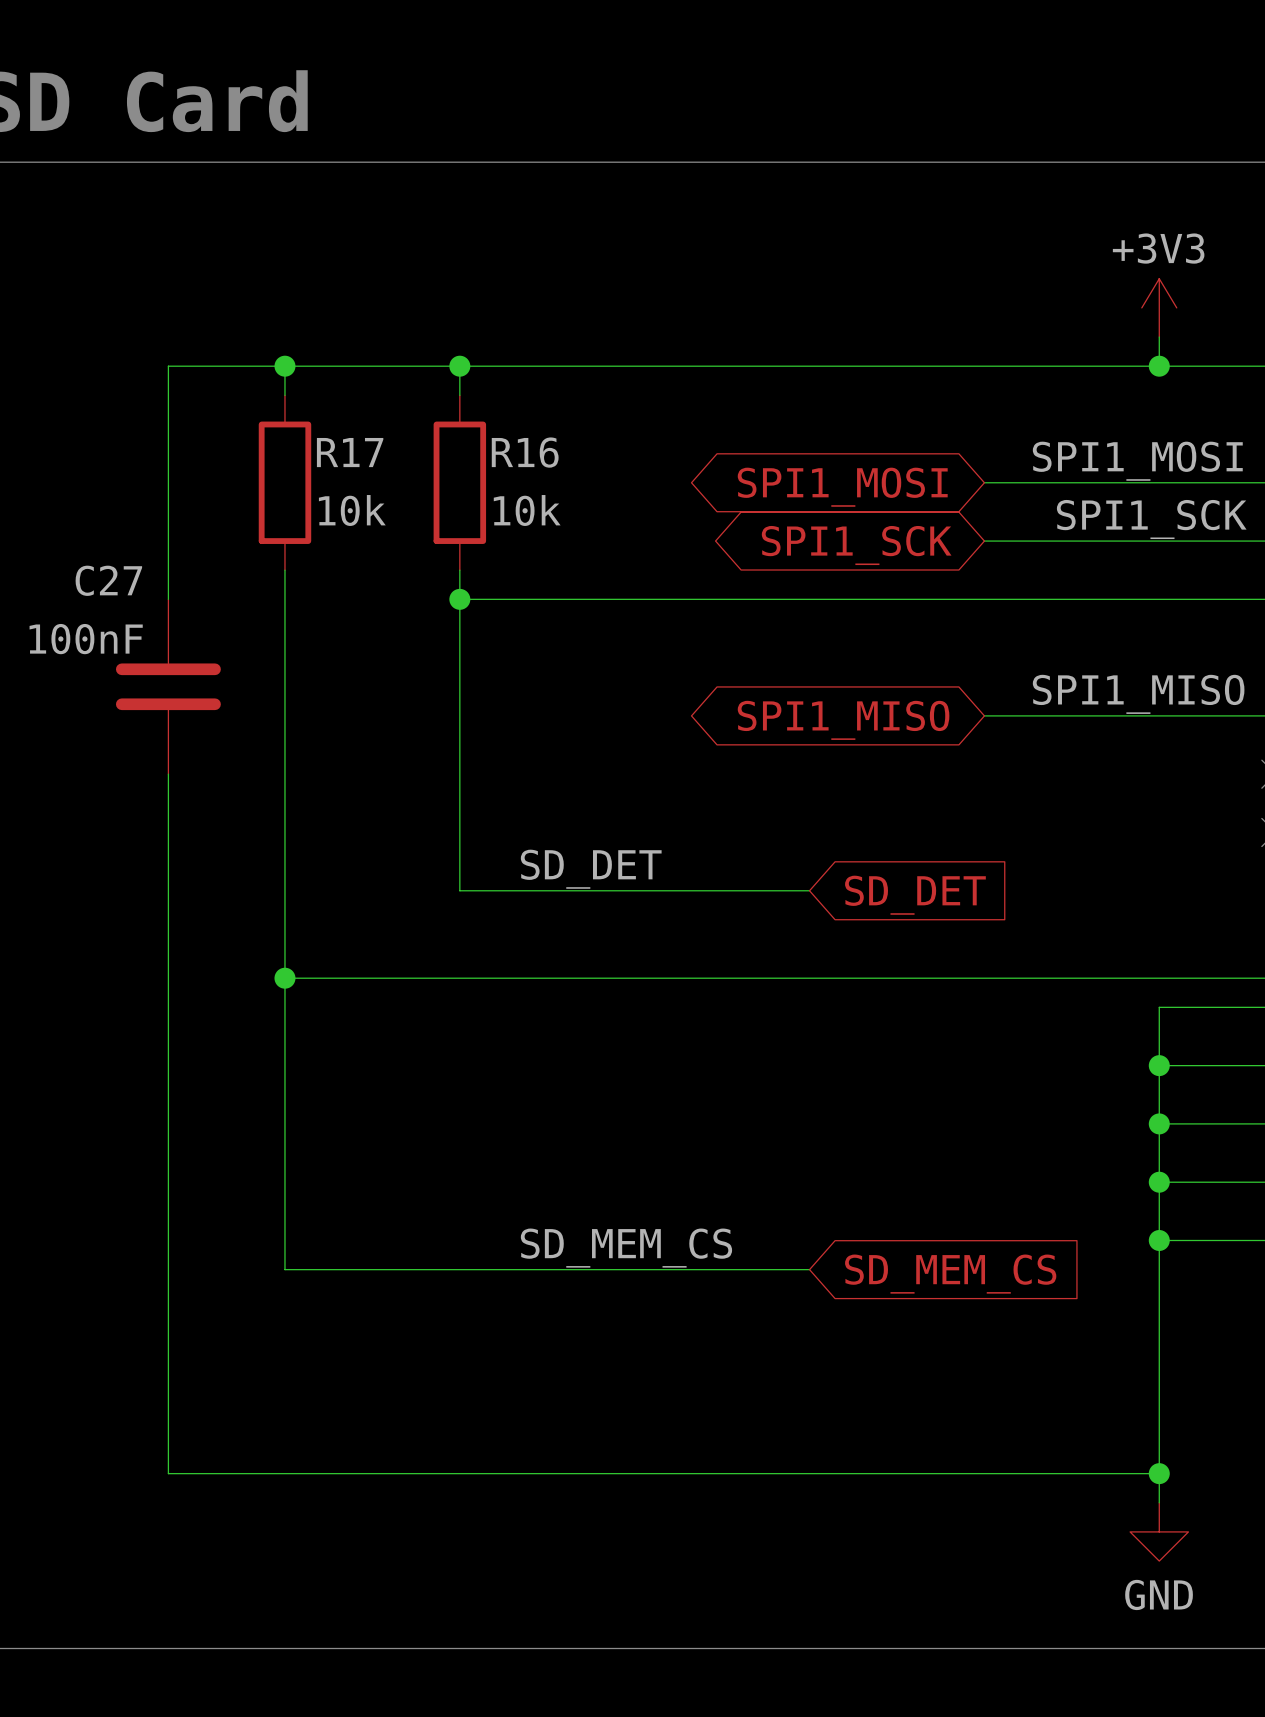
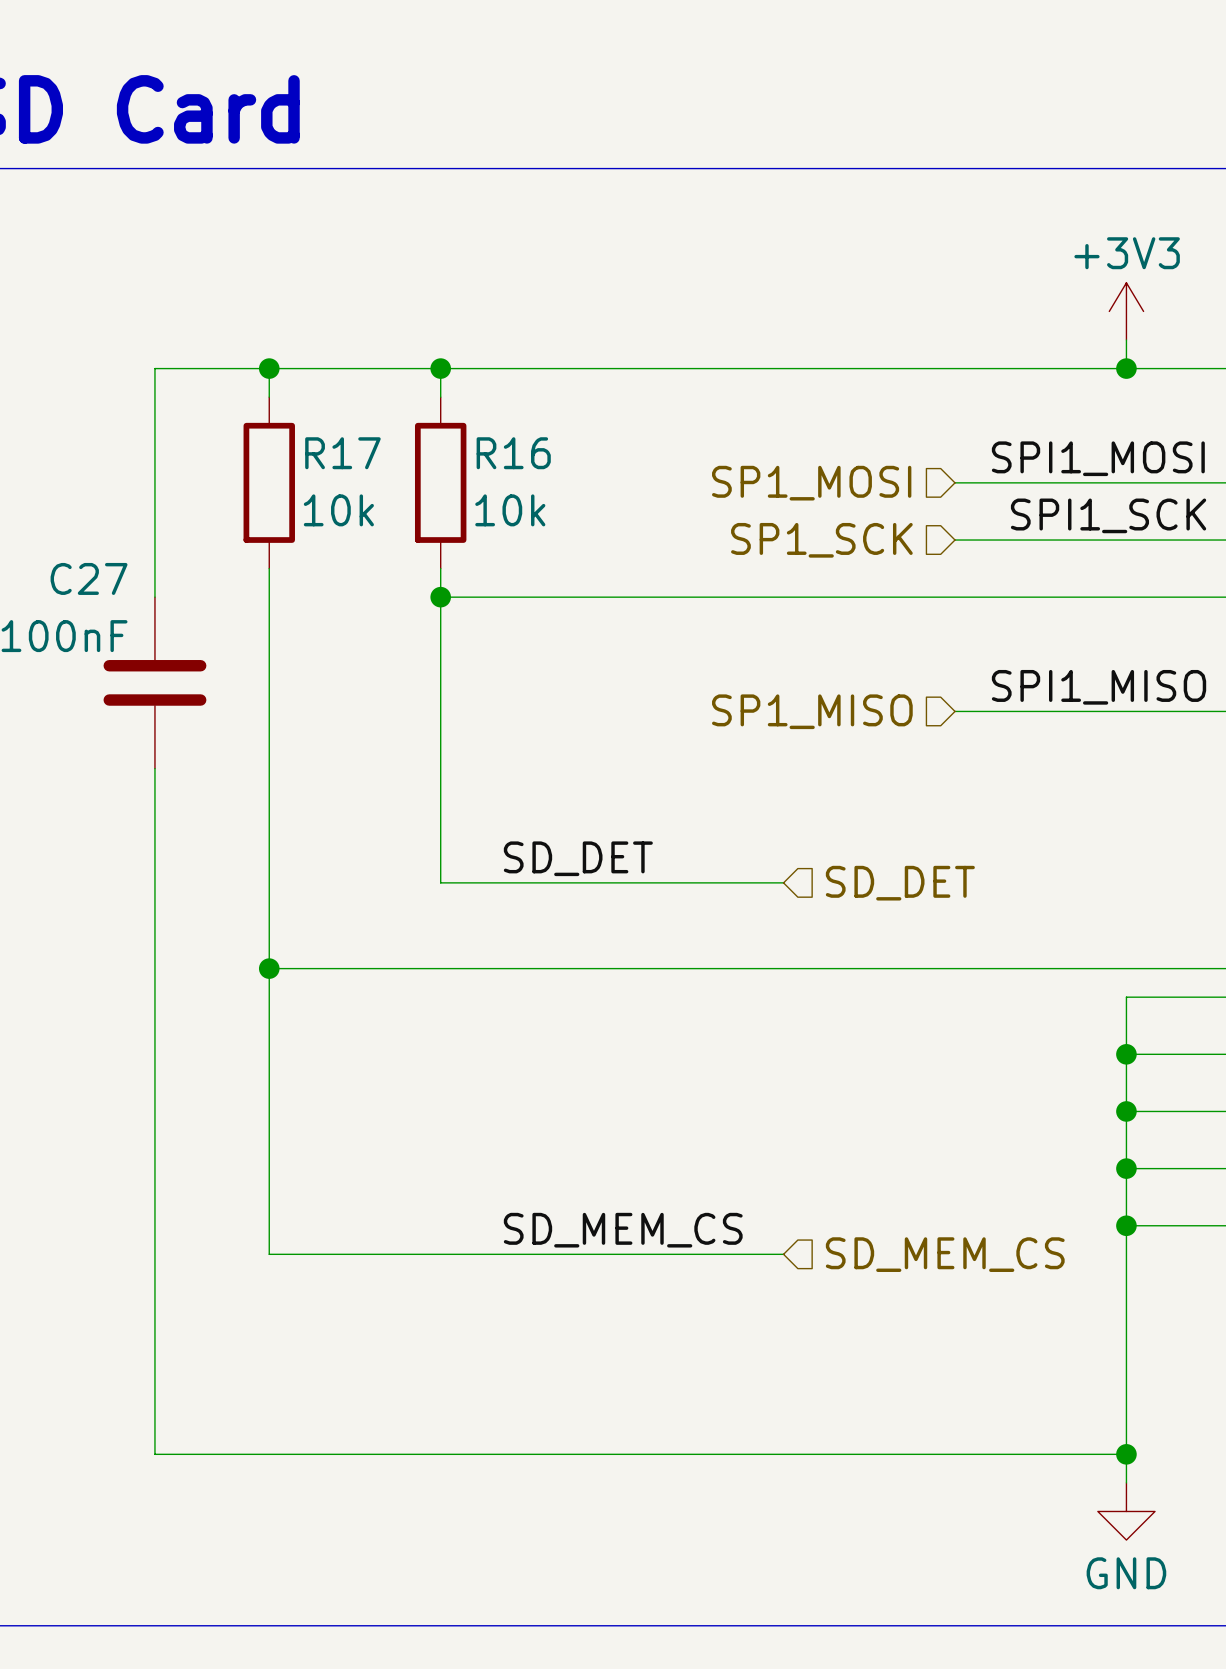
hierarchical label: none -> SP1_MOSI (811, 483)
global label: SPI1_MOSI (842, 487) -> none
hierarchical label: none -> SP1_SCK (821, 540)
global label: SPI1_SCK (856, 545) -> none
hierarchical label: none -> SP1_MISO (812, 711)
global label: SPI1_MISO (843, 720) -> none
hierarchical label: none -> SD_DET (900, 883)
global label: SD_DET (915, 895) -> none
hierarchical label: none -> SD_MEM_CS (945, 1254)
global label: SD_MEM_CS (950, 1274) -> none

